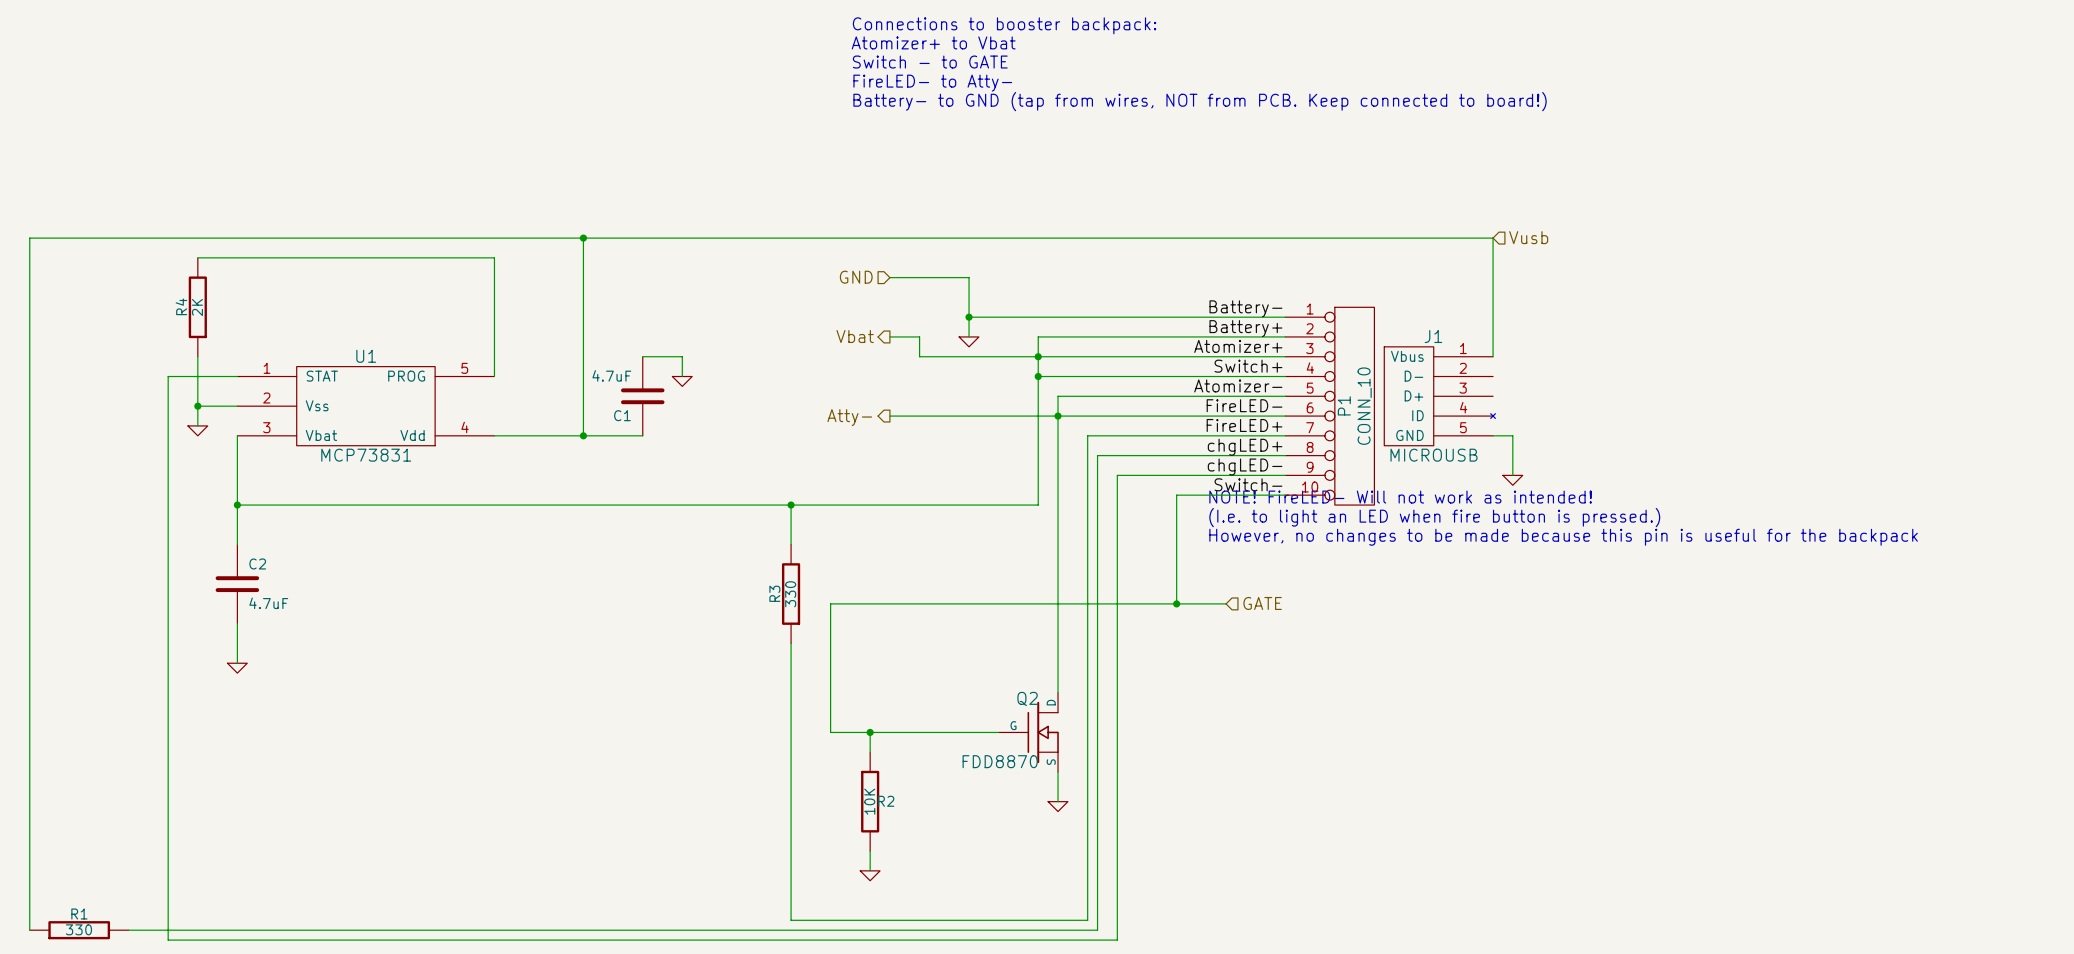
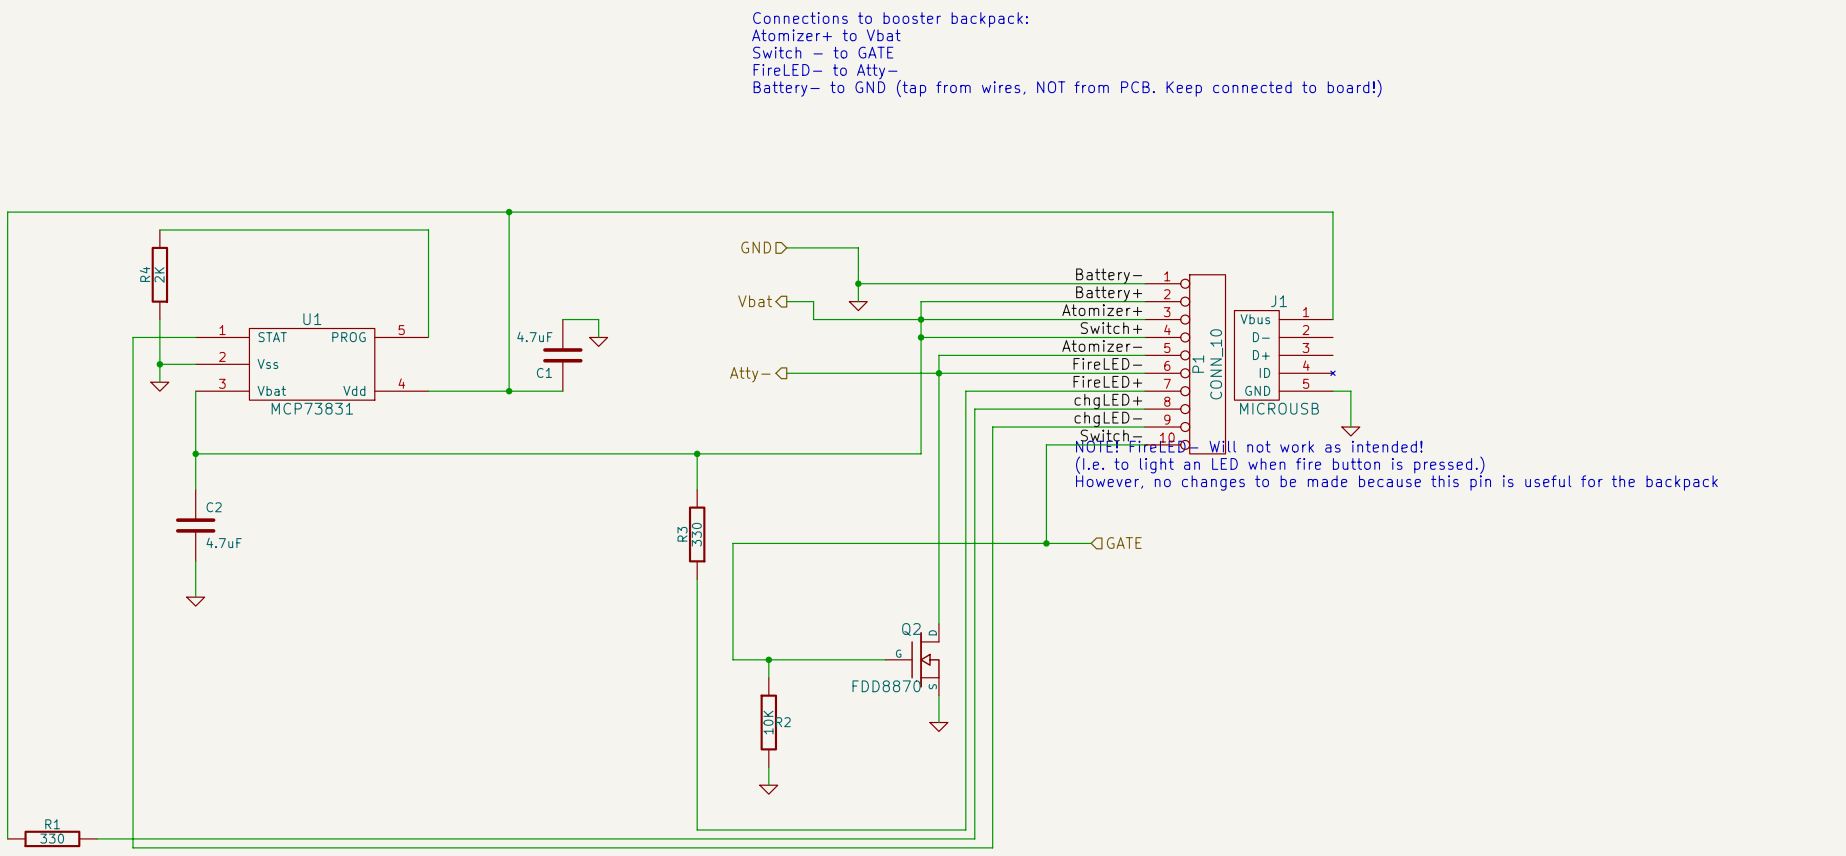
hierarchical label: Vusb (1528, 237) -> none

